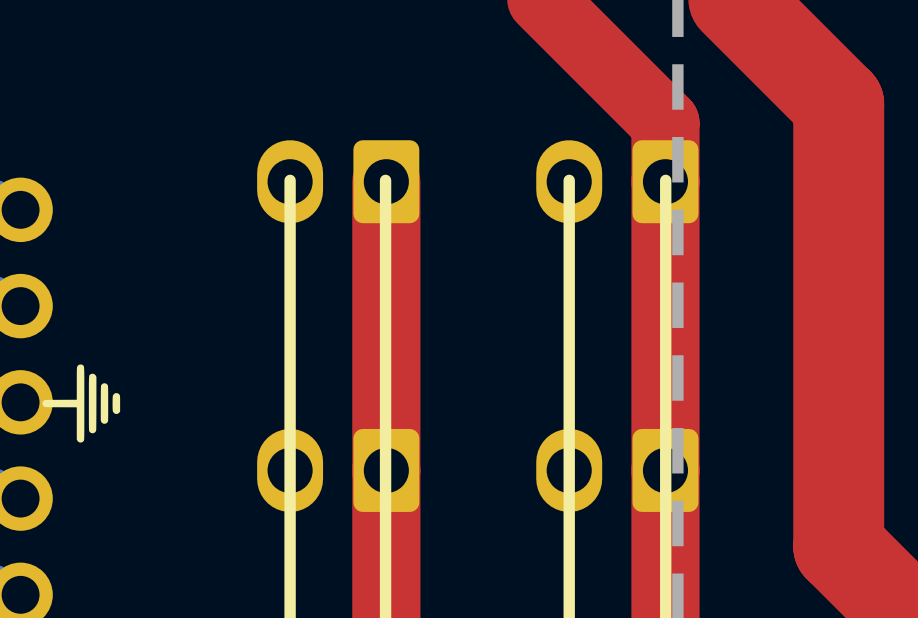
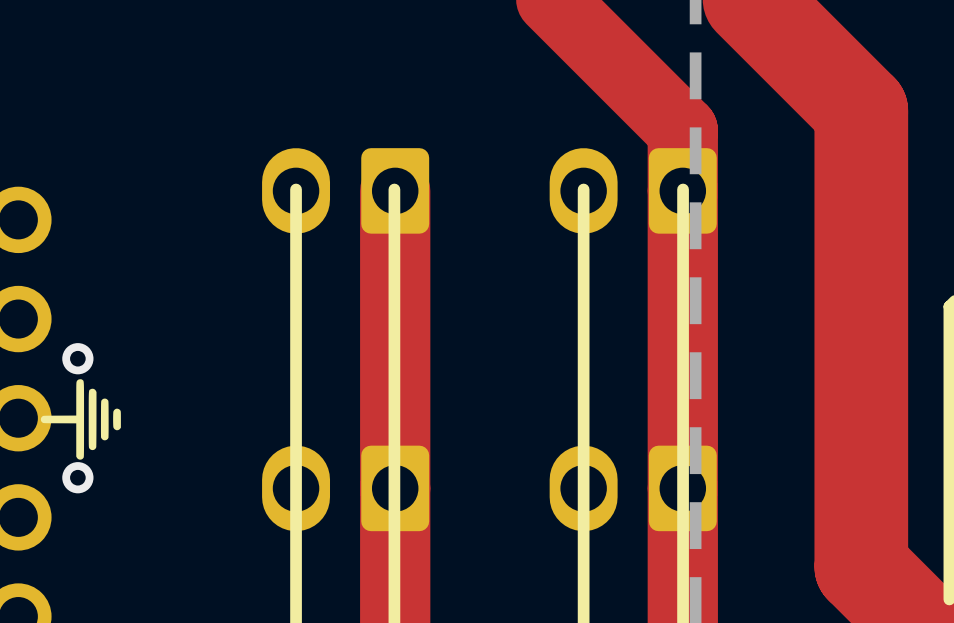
via: none -> (77, 358)
via: none -> (77, 477)

